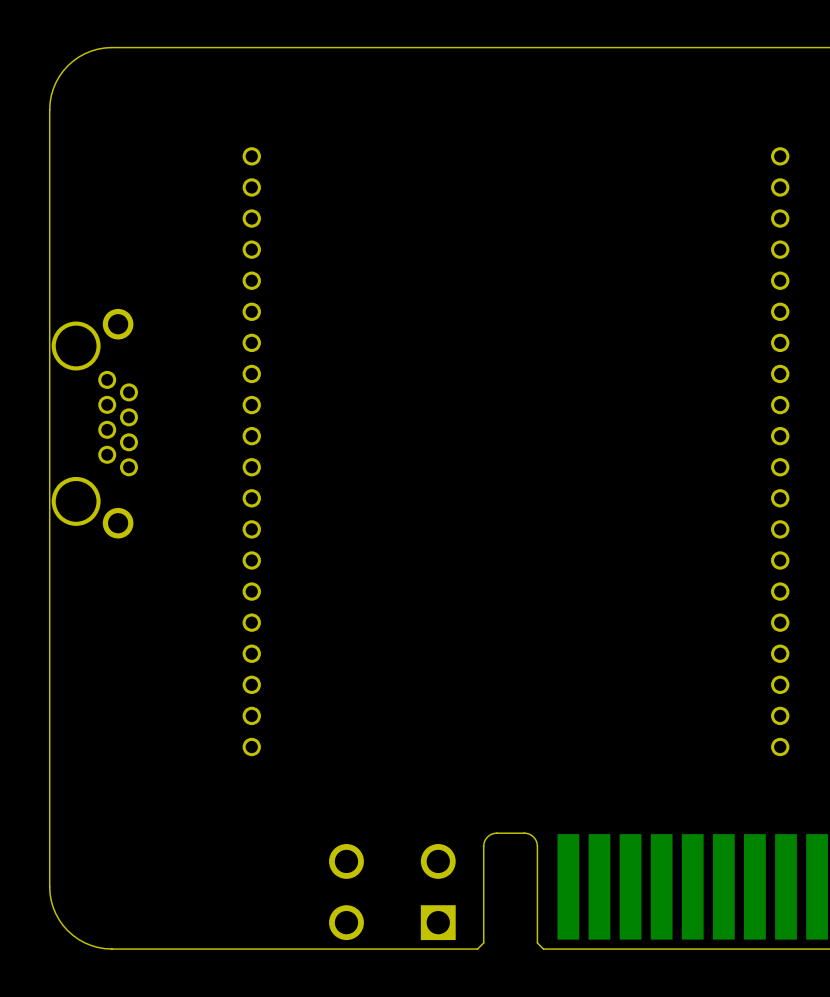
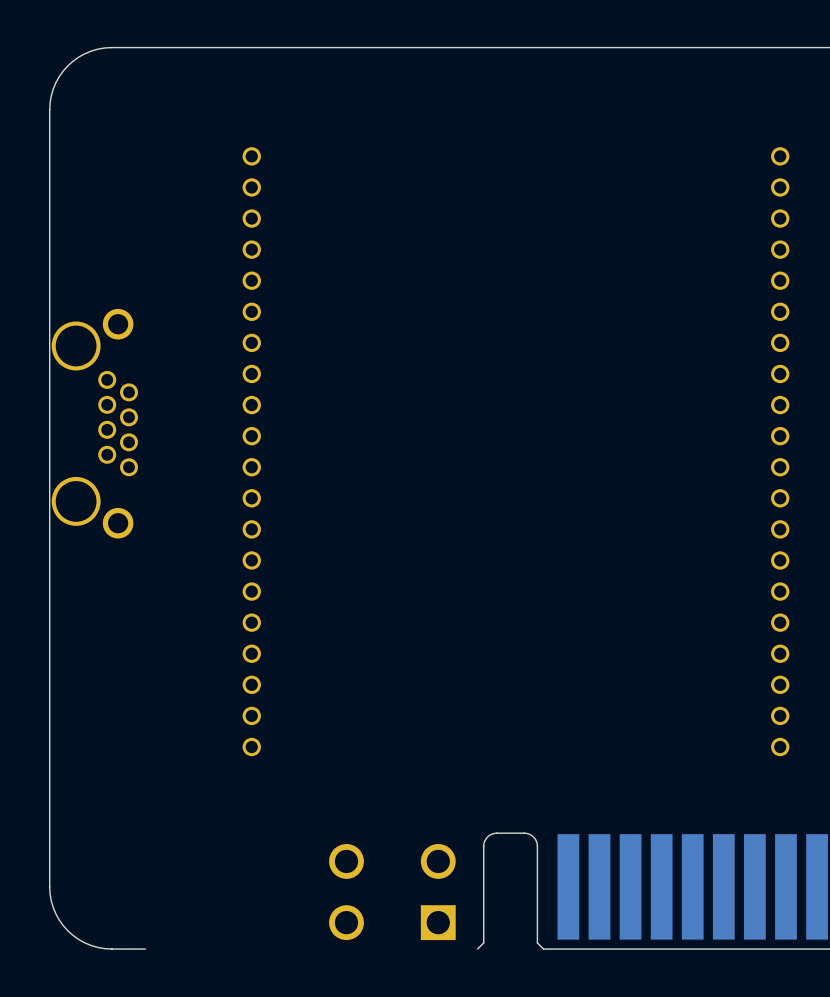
board edge: (477, 949) (145, 949) -> none

